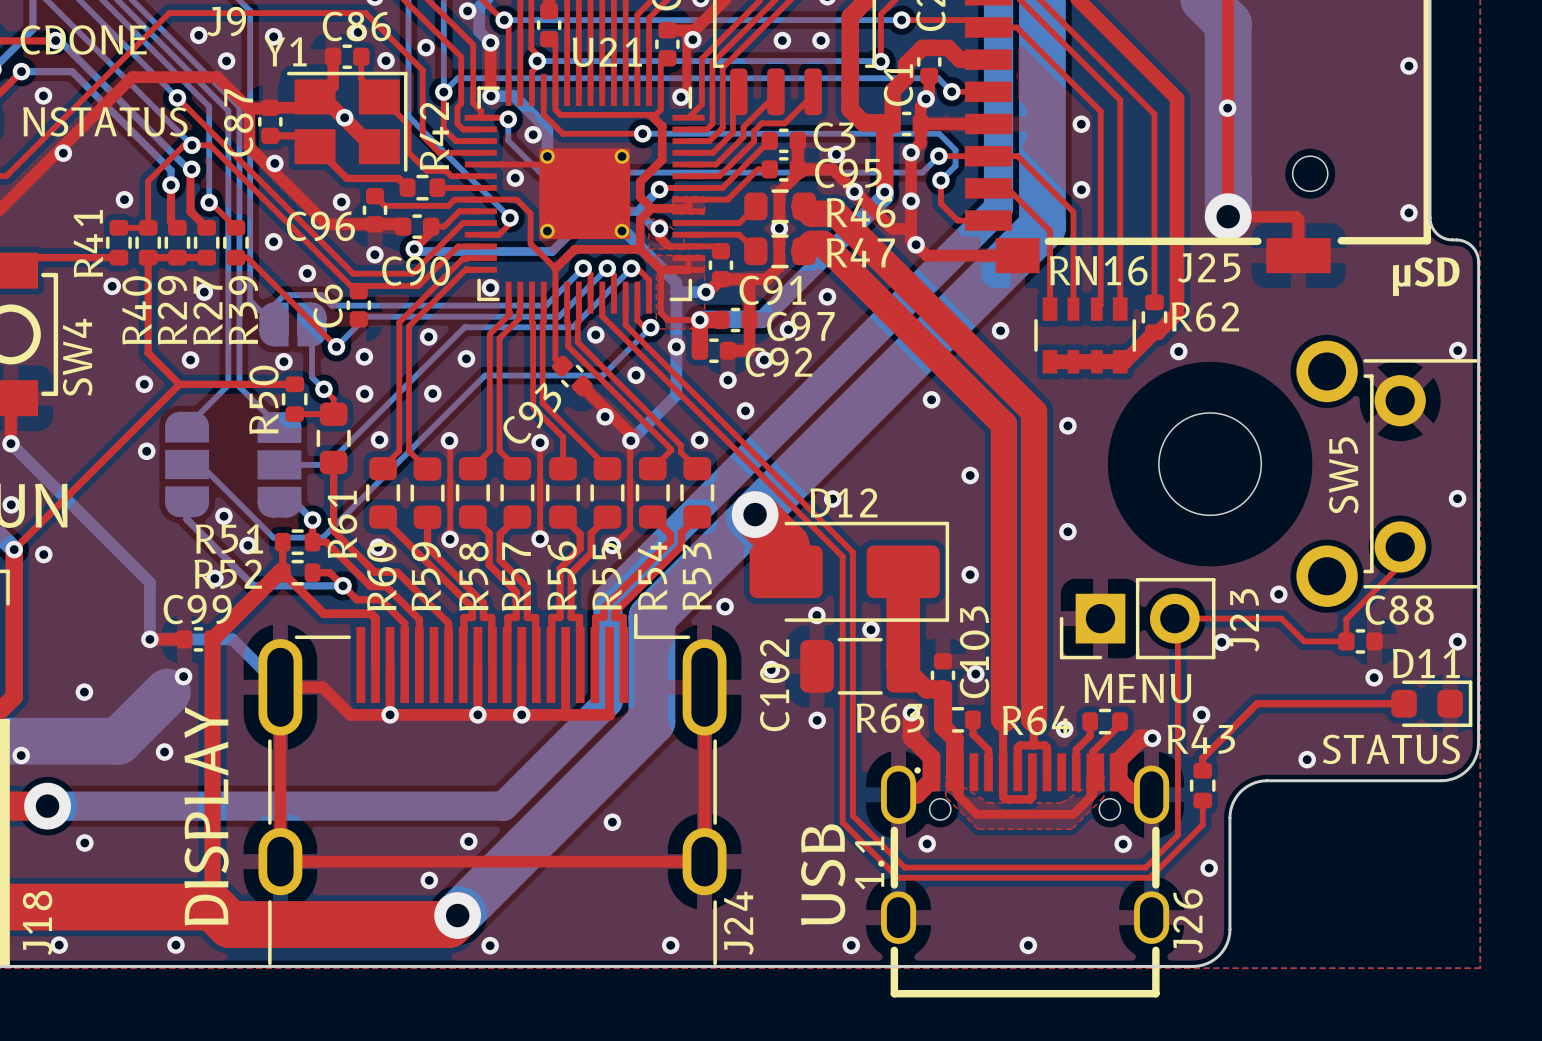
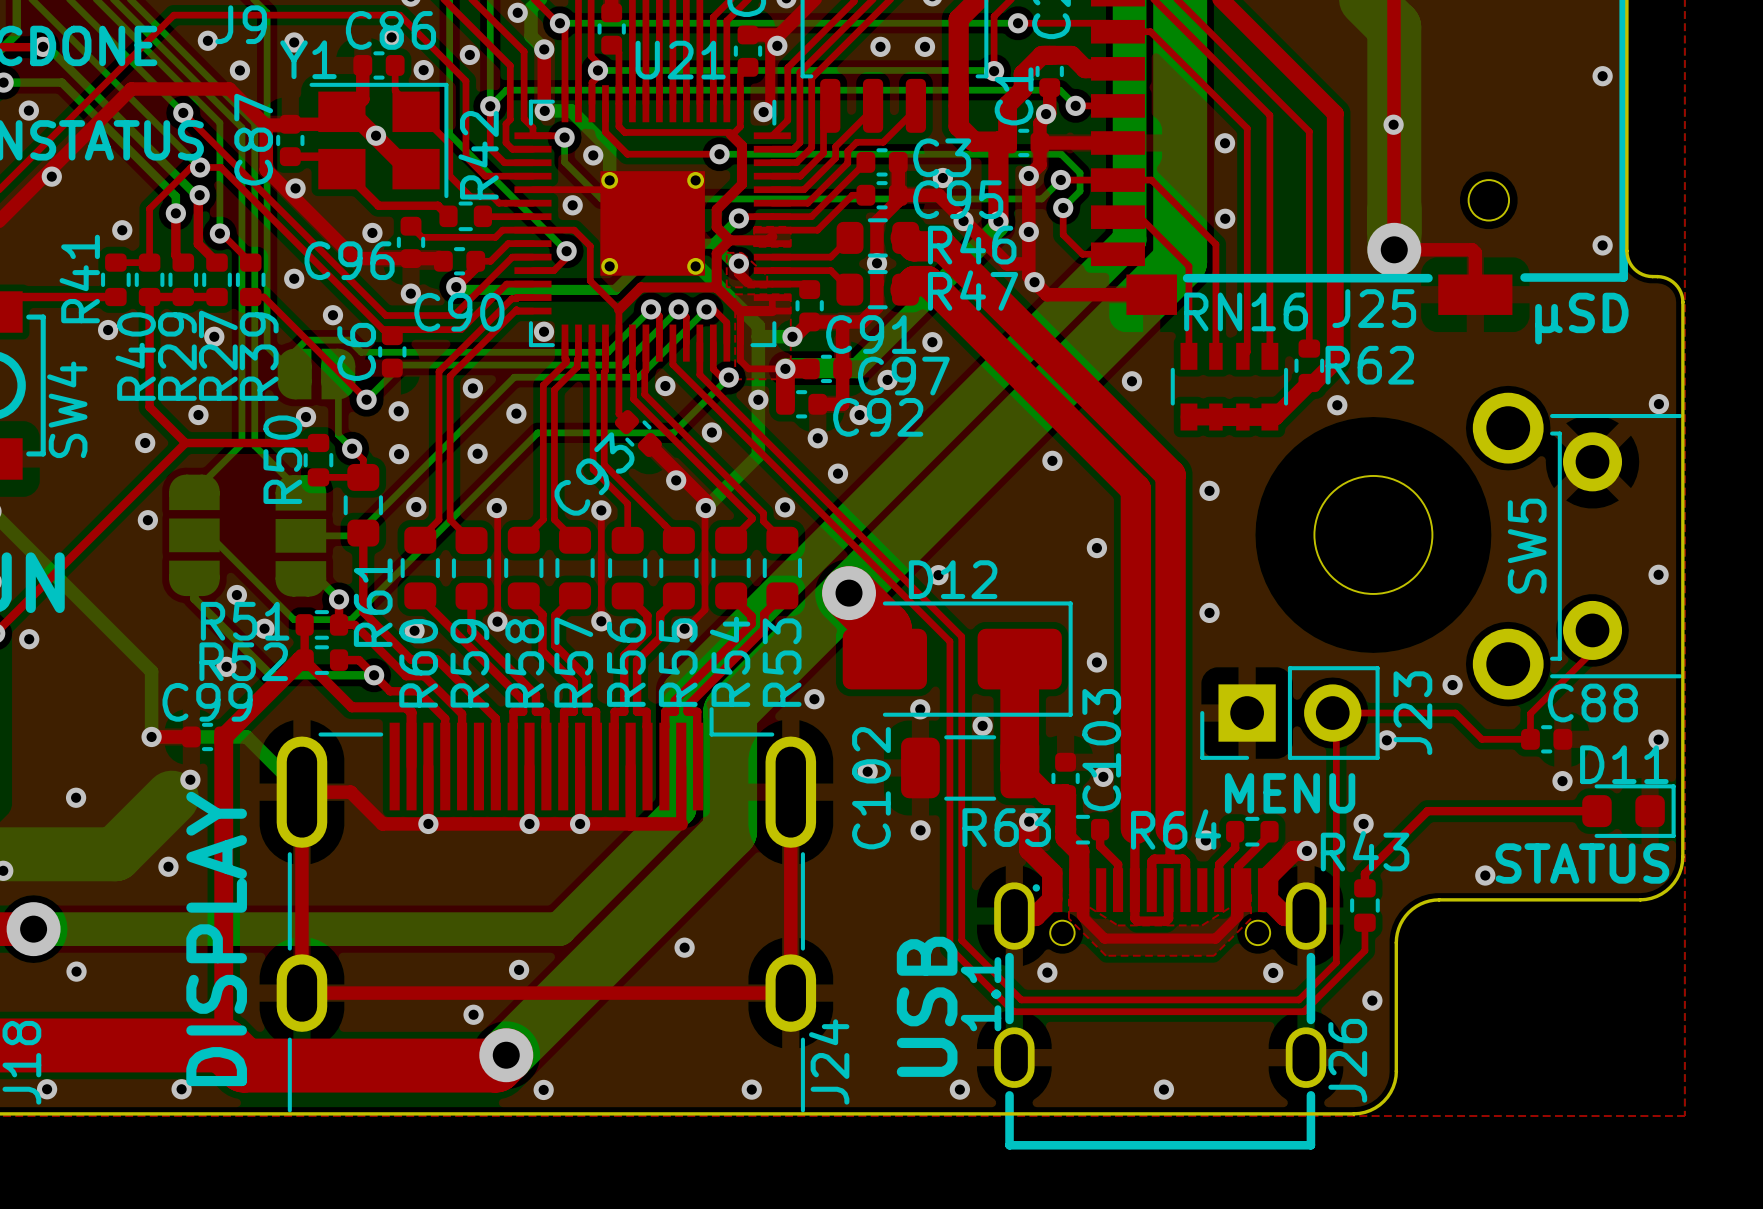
text position: μSD (1426, 276) -> μSD (1581, 318)

